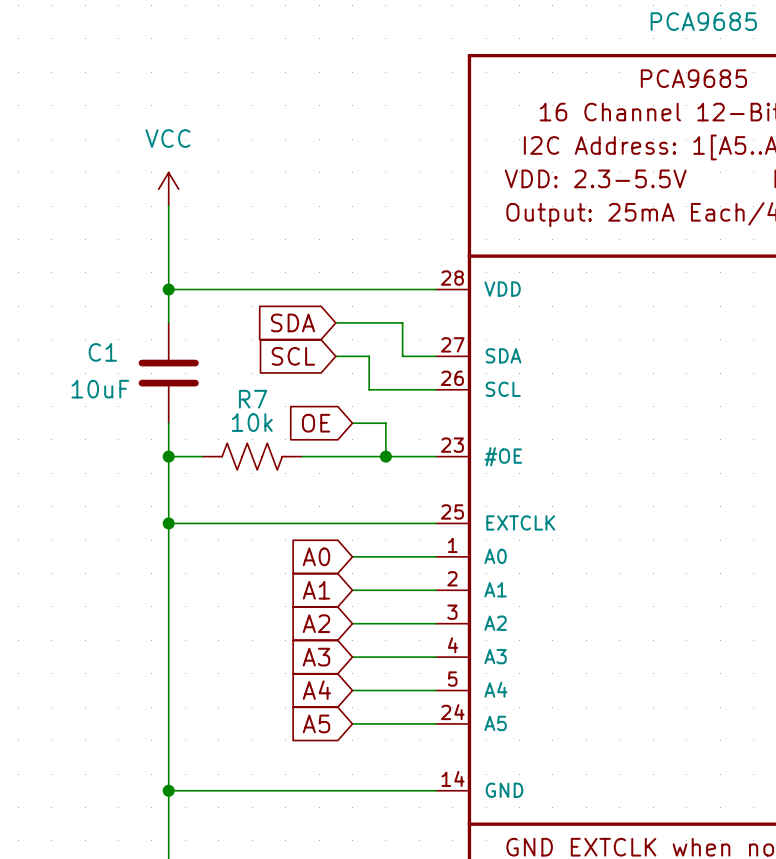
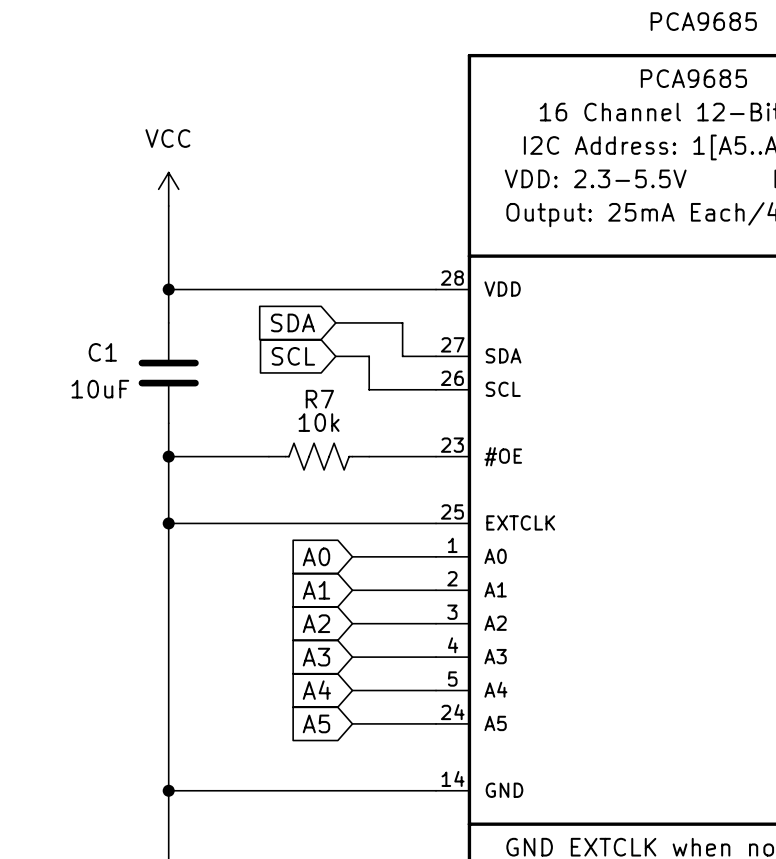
global label: OE (316, 423) -> none
wire: (352, 423) (385, 423) (385, 456) -> none
R7 position: (252, 456) -> (319, 456)
wire: (302, 456) (369, 456) -> (202, 456) (268, 456)
junction: (385, 456) -> none

